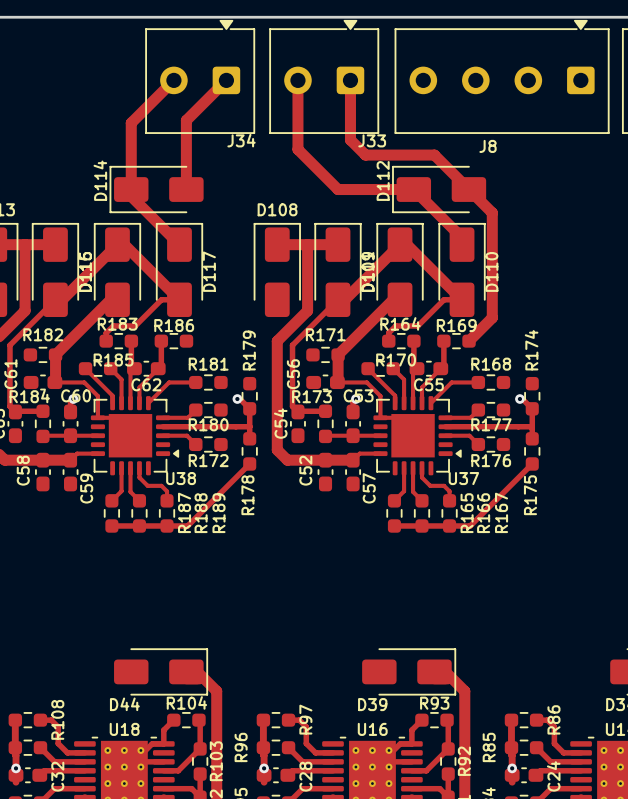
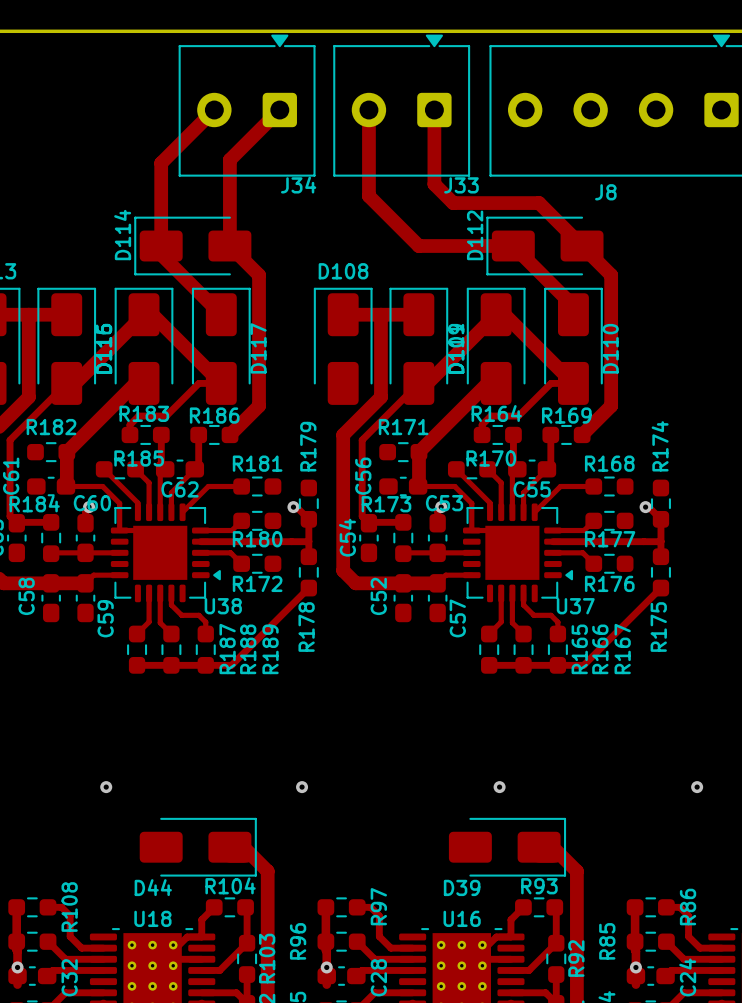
track: none -> (229, 246) (259, 275) (259, 405) (230, 434)
via: none -> (106, 787)
via: none -> (302, 787)
via: none -> (499, 787)
via: none -> (697, 787)

